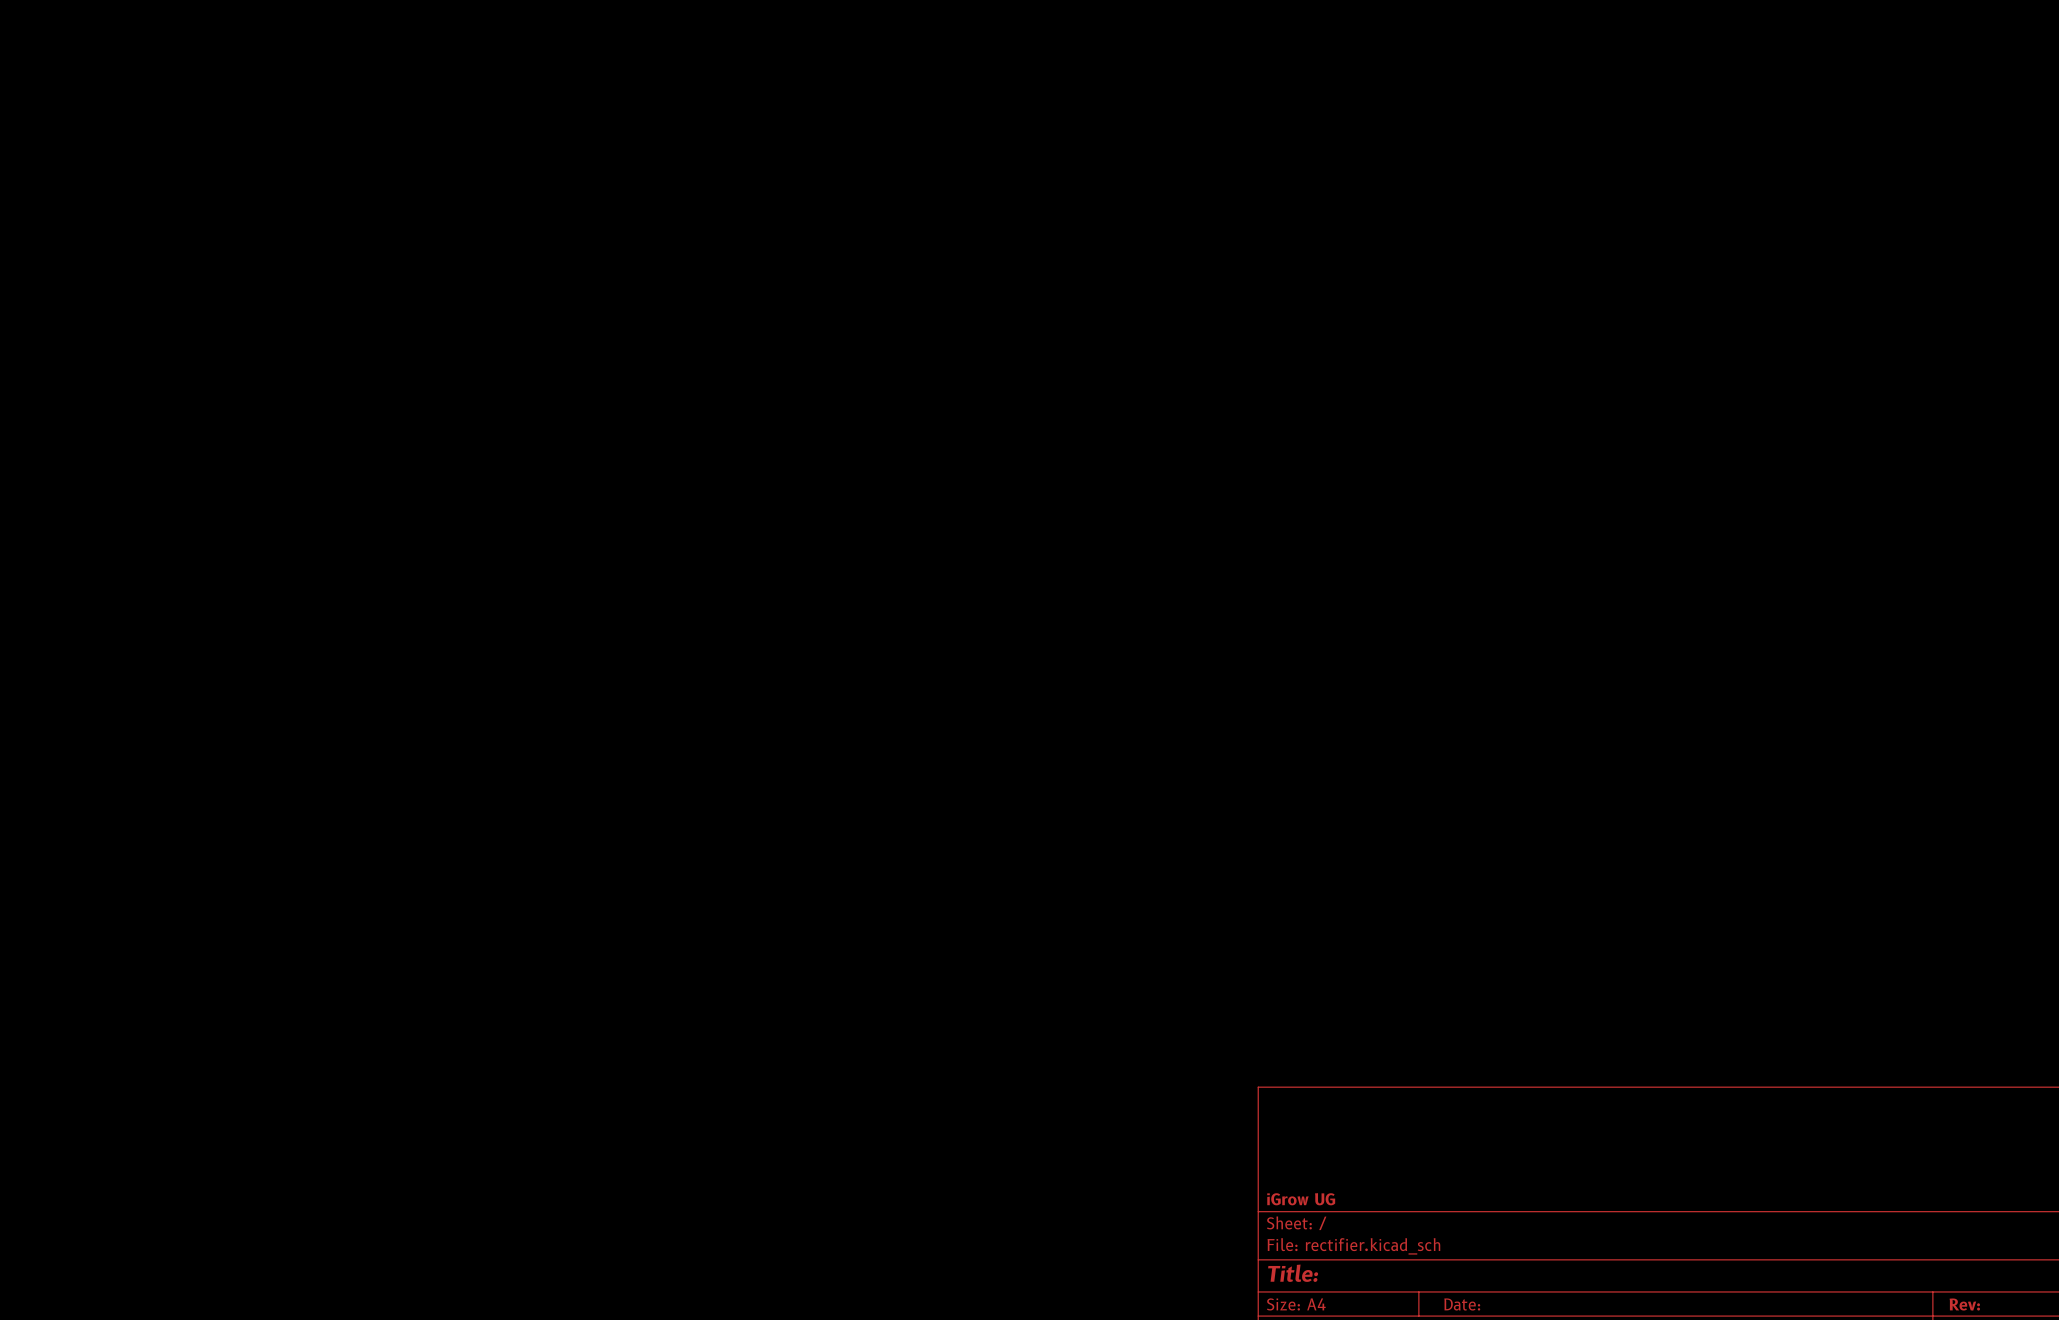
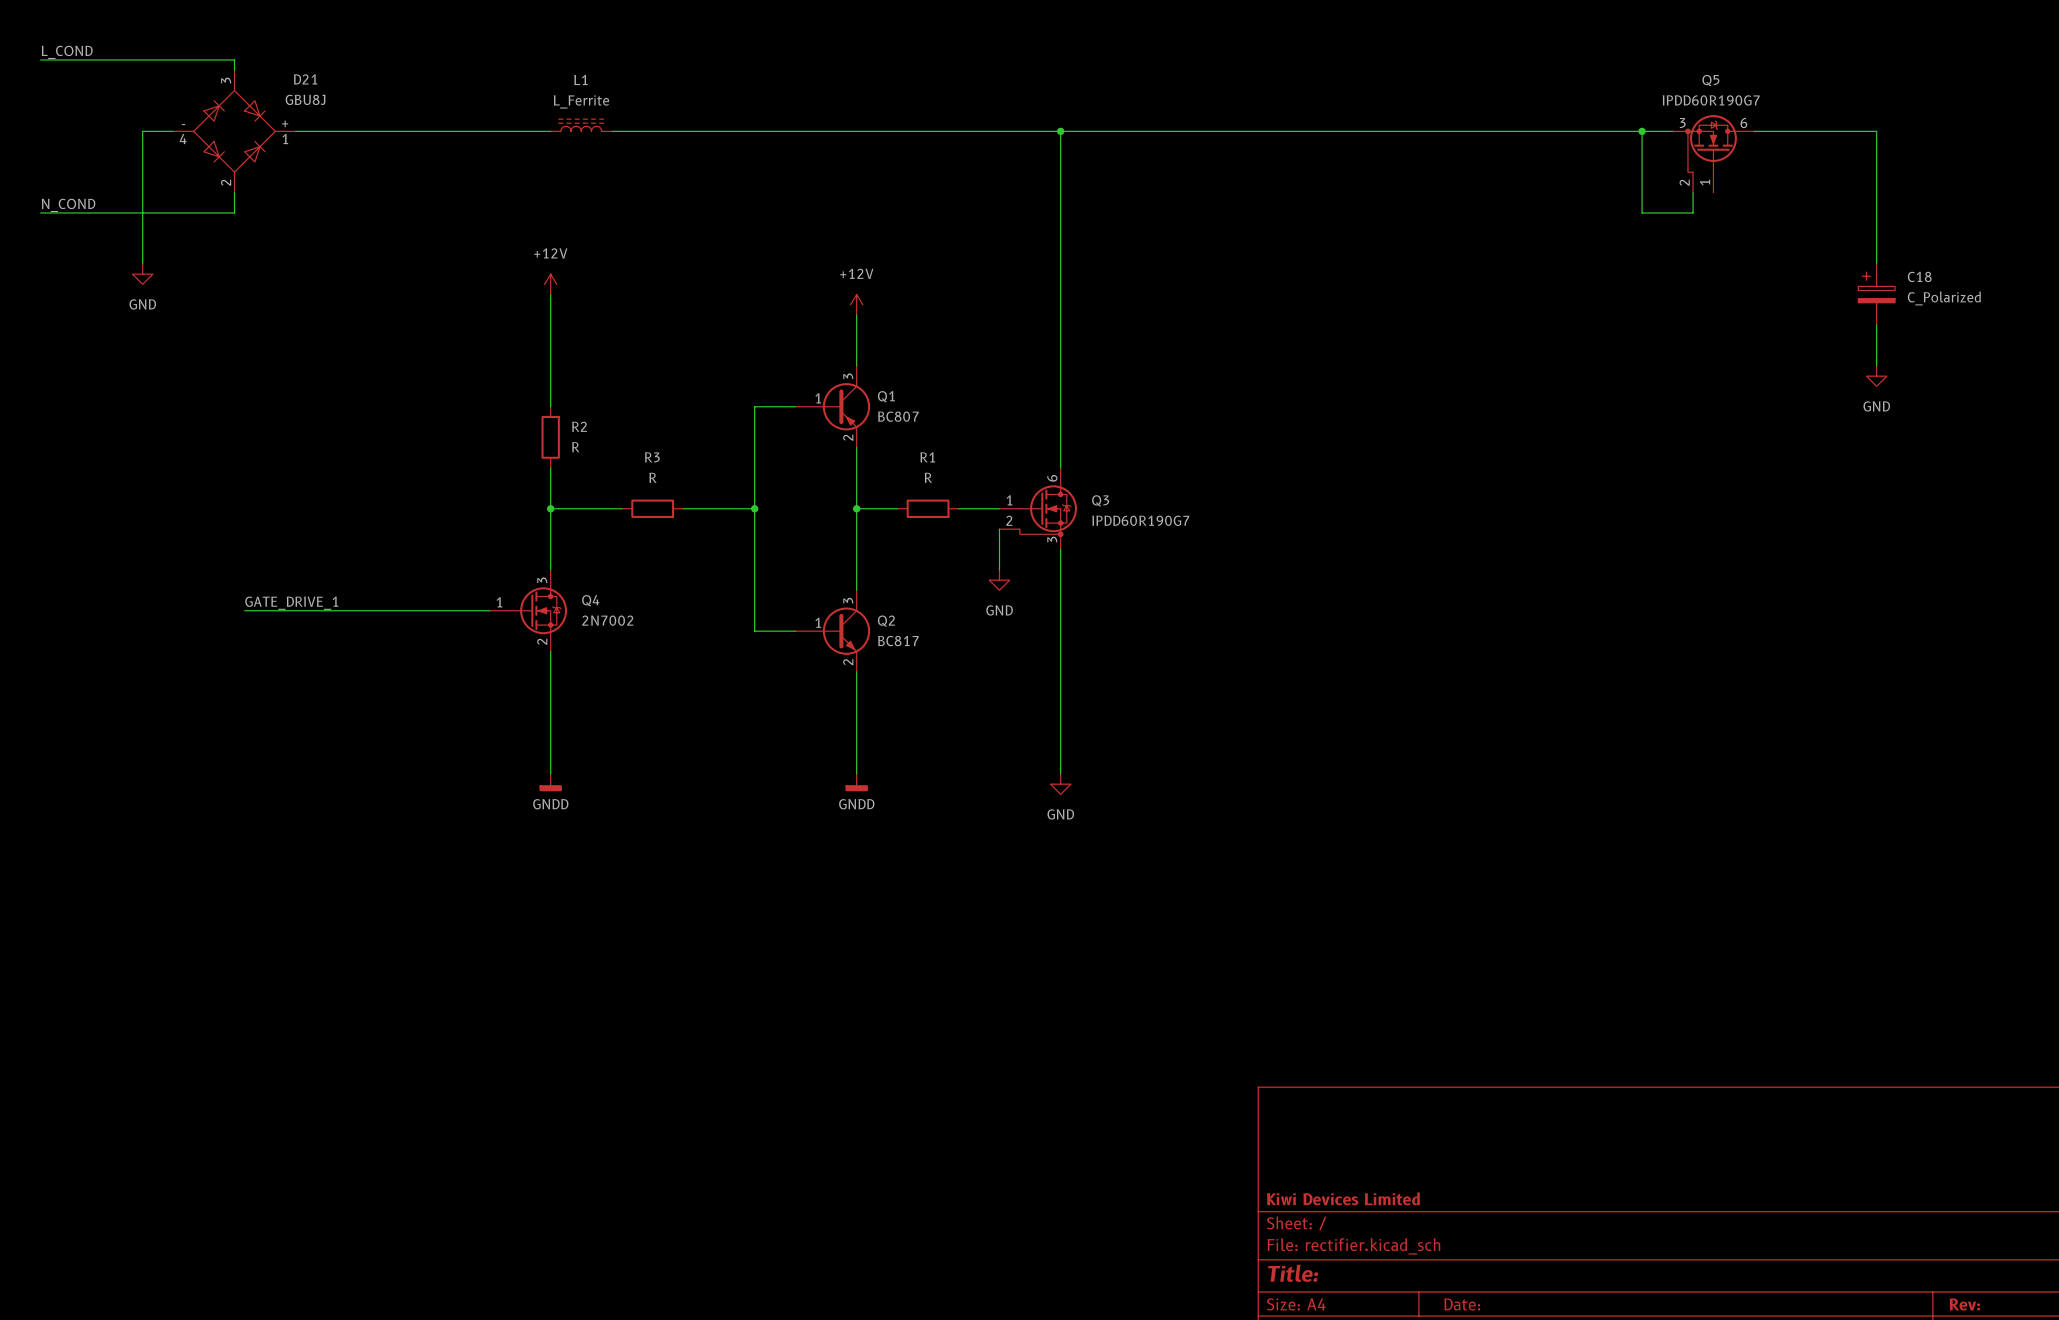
label: none -> L_COND (67, 52)
wire: none -> (40, 59) (234, 59) (234, 70)
L1: none -> L_Ferrite (581, 125)
wire: none -> (173, 131) (142, 131) (142, 263)
D21: none -> GBU8J (234, 131)
wire: none -> (295, 131) (550, 131)
wire: none -> (611, 131) (1672, 131)
wire: none -> (1060, 131) (1060, 467)
junction: none -> (1060, 131)
wire: none -> (1642, 131) (1642, 212) (1693, 212) (1693, 192)
junction: none -> (1642, 131)
wire: none -> (1754, 131) (1876, 131) (1876, 263)
Q5: none -> IPDD60R190G7 (1713, 153)
wire: none -> (234, 192) (234, 212) (40, 212)
label: none -> N_COND (68, 205)
power symbol: none -> GND (142, 274)
power symbol: none -> +12V (550, 284)
wire: none -> (550, 294) (550, 406)
C18: none -> C_Polarized (1876, 294)
power symbol: none -> +12V (856, 304)
wire: none -> (856, 314) (856, 365)
wire: none -> (1876, 325) (1876, 365)
power symbol: none -> GND (1876, 376)
wire: none -> (795, 406) (754, 406) (754, 631) (795, 631)
Q1: none -> BC807 (832, 406)
R2: none -> R (550, 437)
wire: none -> (856, 447) (856, 590)
wire: none -> (550, 467) (550, 569)
wire: none -> (550, 508) (622, 508)
junction: none -> (550, 508)
R3: none -> R (652, 508)
wire: none -> (683, 508) (754, 508)
junction: none -> (754, 508)
wire: none -> (856, 508) (897, 508)
junction: none -> (856, 508)
R1: none -> R (928, 508)
wire: none -> (958, 508) (999, 508)
Q3: none -> IPDD60R190G7 (1038, 508)
wire: none -> (999, 529) (999, 569)
wire: none -> (1060, 549) (1060, 773)
power symbol: none -> GND (999, 580)
label: none -> GATE_DRIVE_1 (291, 603)
wire: none -> (244, 610) (489, 610)
Q4: none -> 2N7002 (528, 610)
Q2: none -> BC817 (832, 631)
wire: none -> (550, 651) (550, 773)
wire: none -> (856, 671) (856, 773)
power symbol: none -> GNDD (550, 782)
power symbol: none -> GNDD (856, 782)
power symbol: none -> GND (1060, 784)
title block: iGrow UG (1301, 1199) -> Kiwi Devices Limited (1343, 1198)

